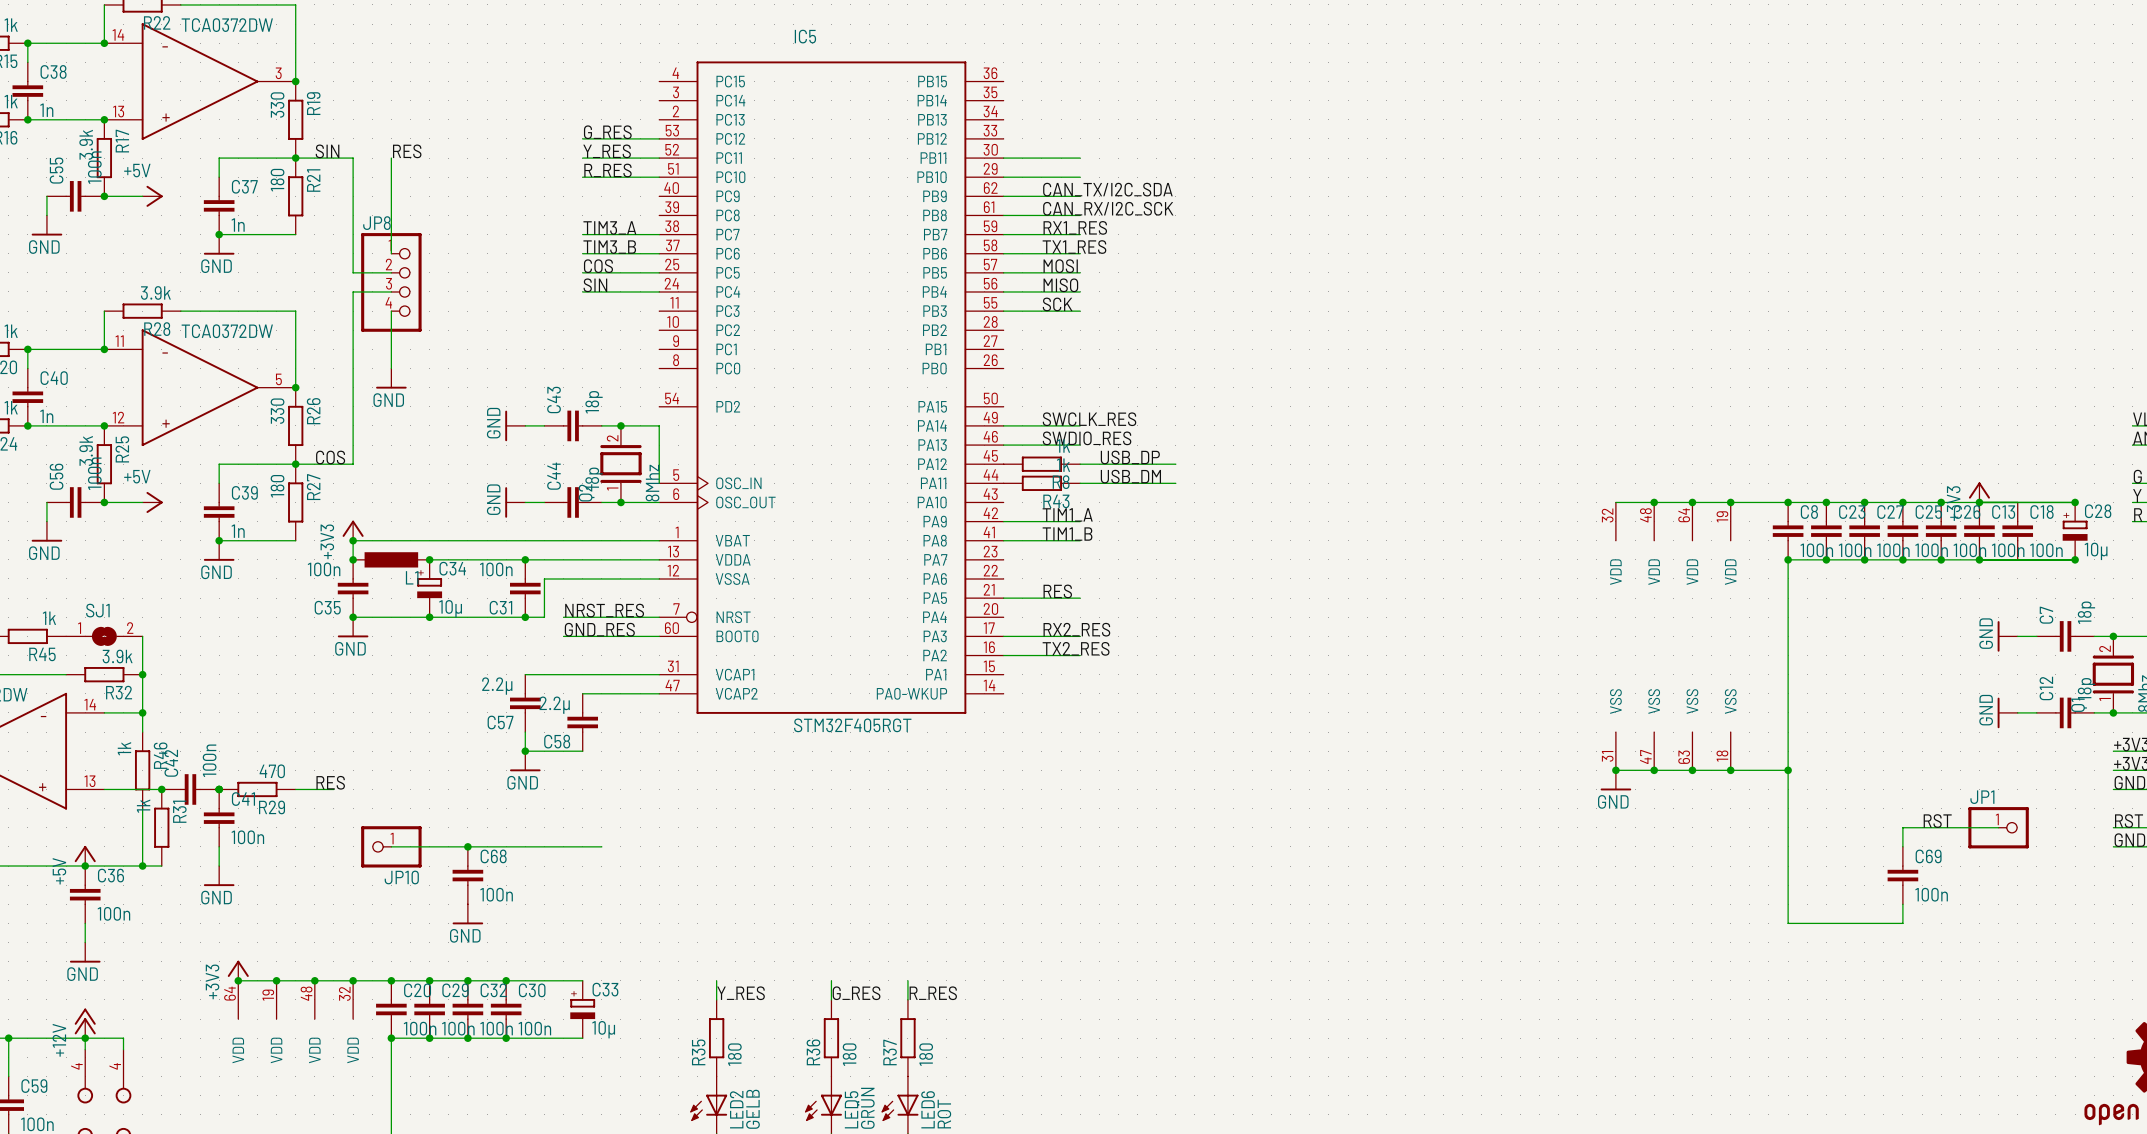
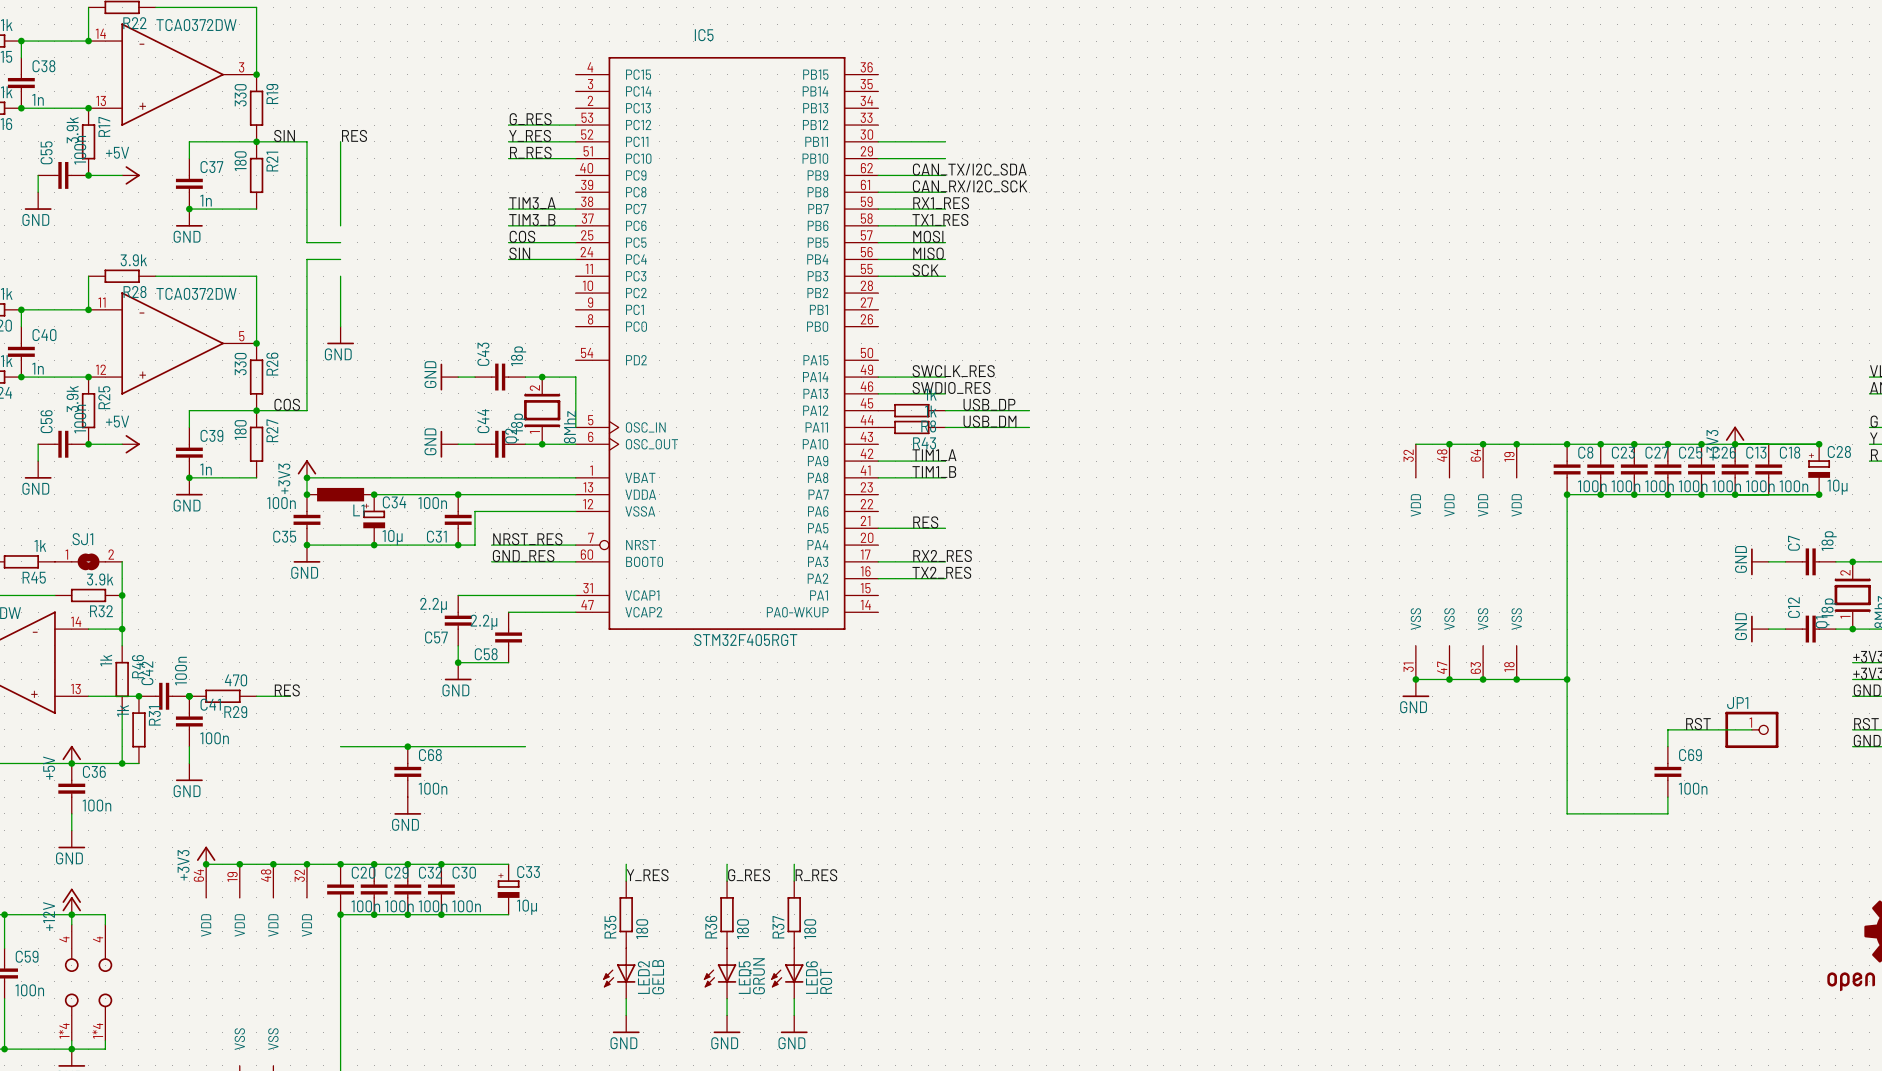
JP8: (391, 282) -> none
JP10: (391, 846) -> none

